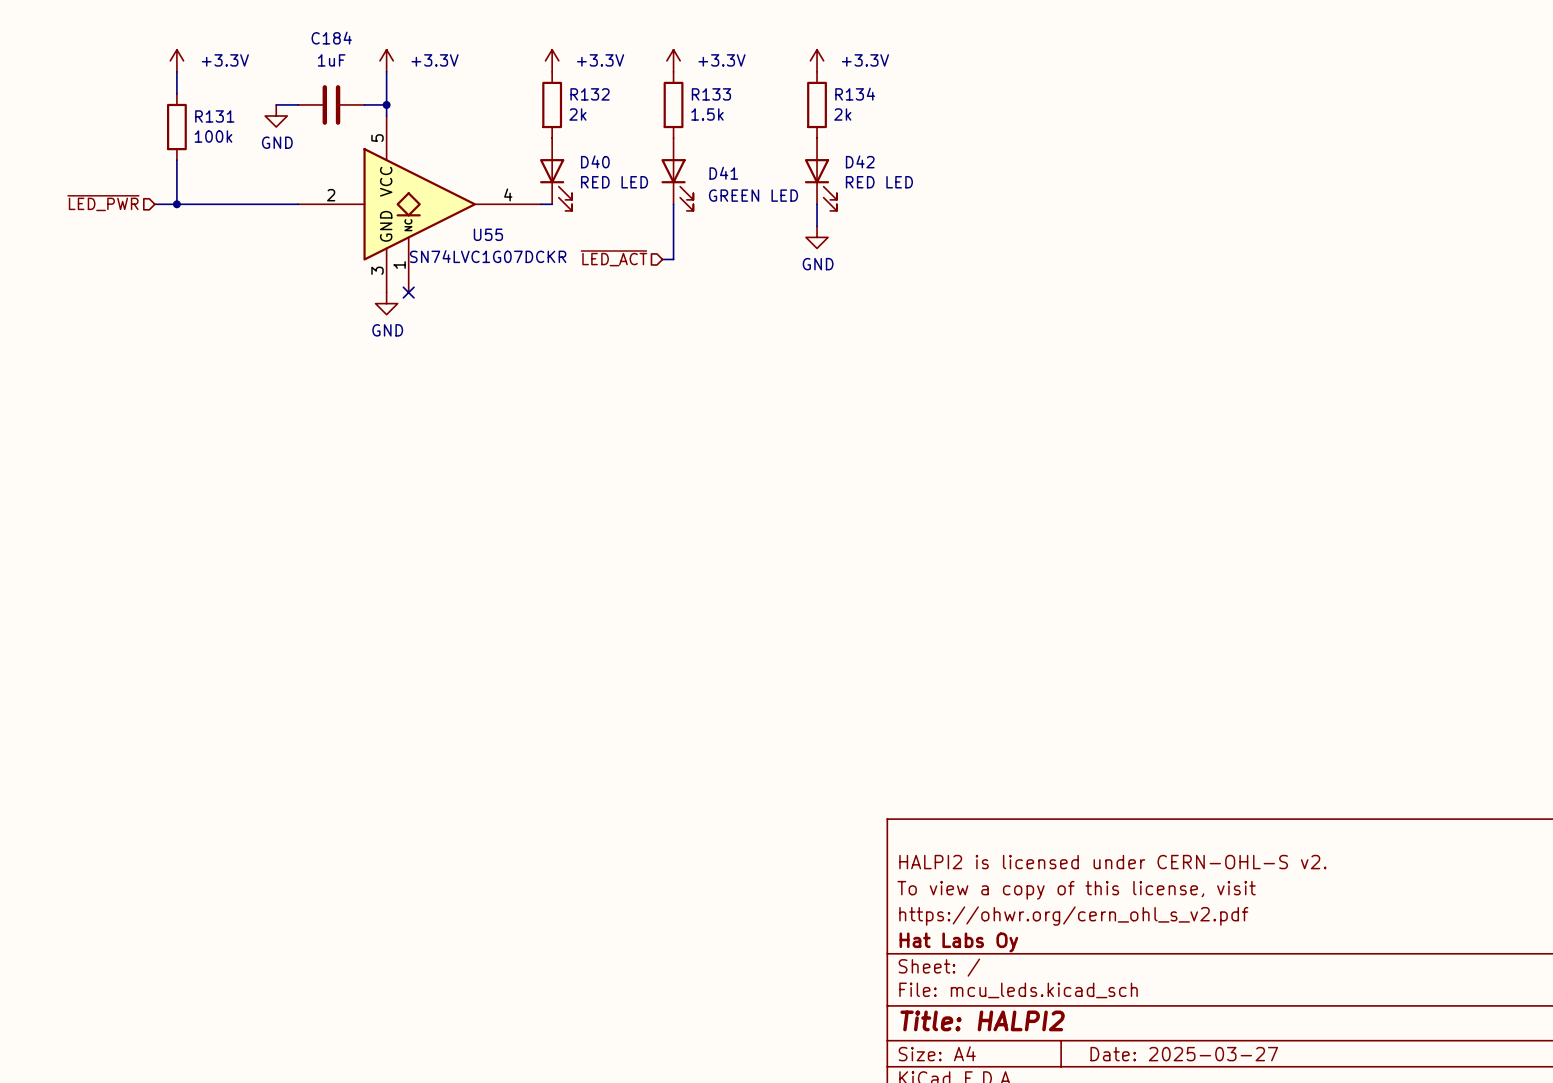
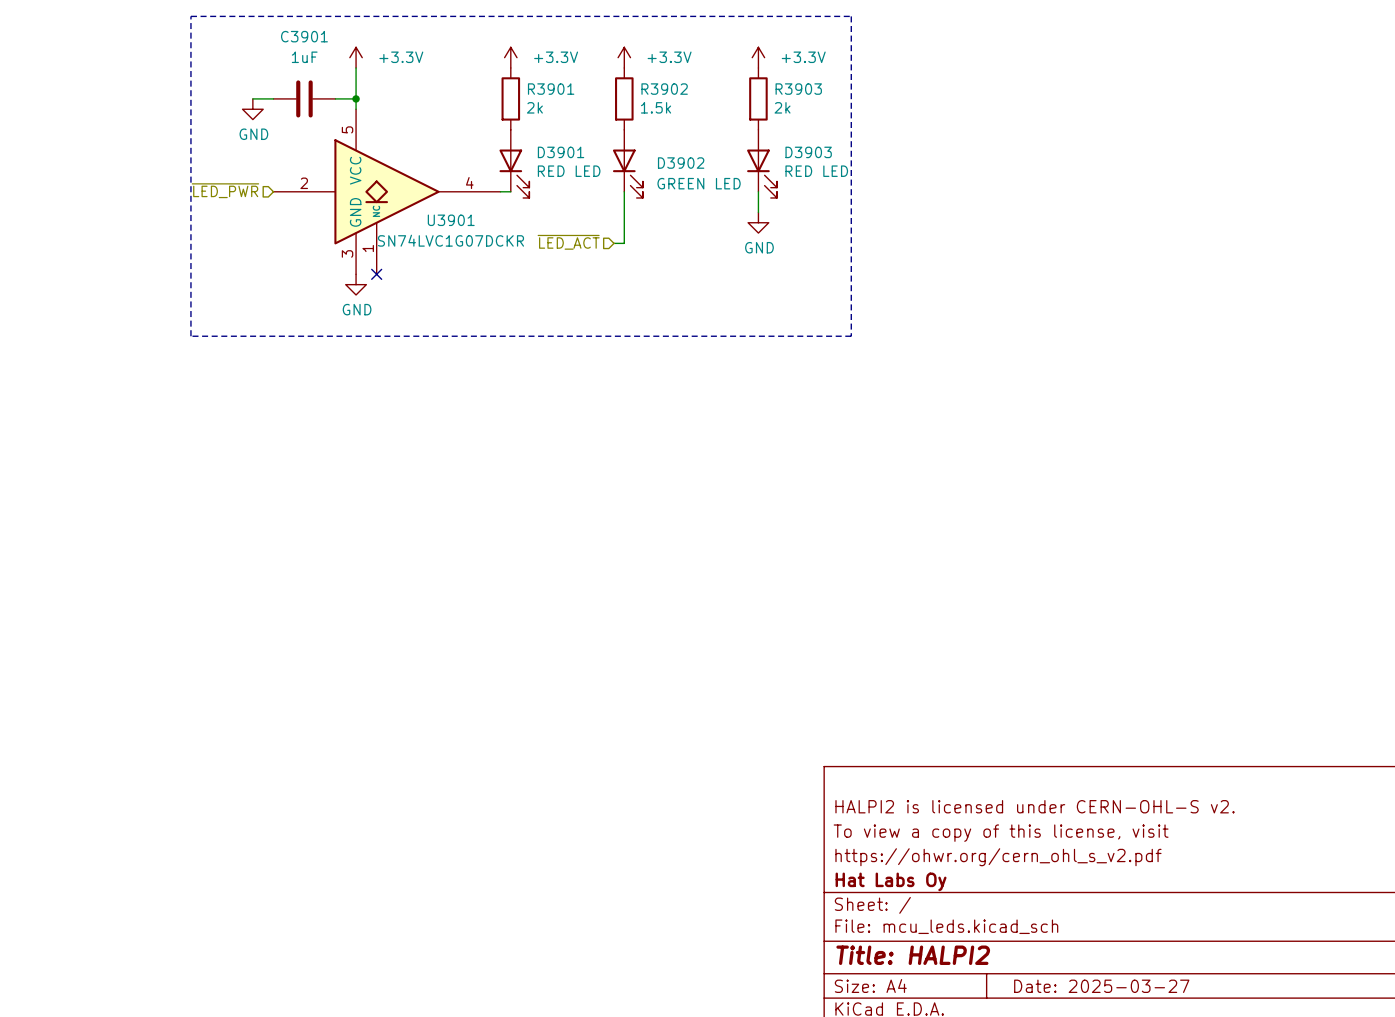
line: none -> (190, 16) (851, 16) (851, 336) (190, 336) (190, 16)
C184 name: C184 (331, 38) -> C3901 (304, 36)
power symbol: +3.3V (176, 60) -> none
wire: (176, 71) (176, 93) -> none
R132 name: R132 (590, 94) -> R3901 (551, 89)
R133 name: R133 (711, 94) -> R3902 (664, 89)
R134 name: R134 (855, 94) -> R3903 (798, 89)
R131: 100k (176, 127) -> none
wire: (176, 160) (176, 204) -> none
D40 name: D40 (595, 161) -> D3901 (561, 152)
D42 name: D42 (860, 161) -> D3903 (808, 152)
D41 name: D41 (723, 173) -> D3902 (681, 163)
hierarchical label position: ~{LED_PWR} (103, 203) -> ~{LED_PWR} (225, 190)
wire: (154, 204) (298, 204) -> none
junction: (176, 204) -> none
U55 name: U55 (488, 234) -> U3901 (451, 220)

